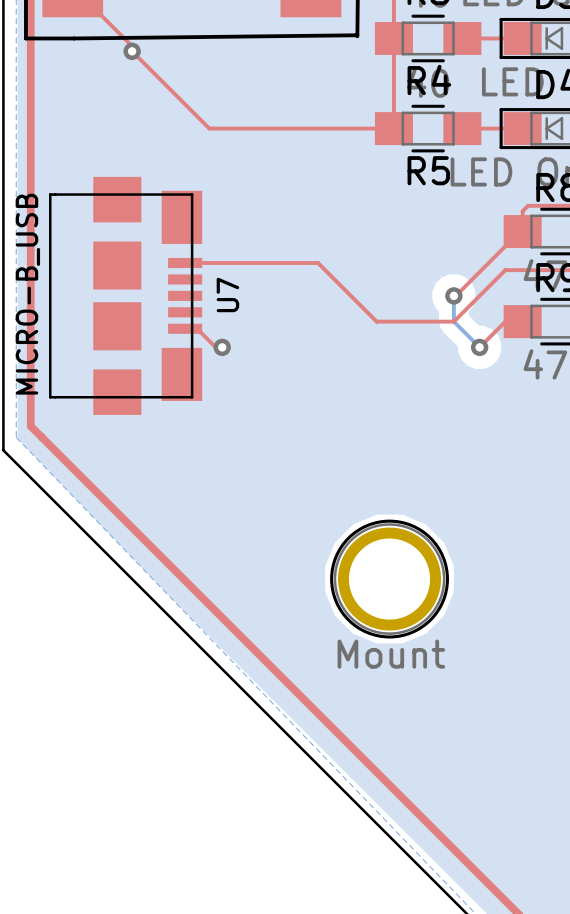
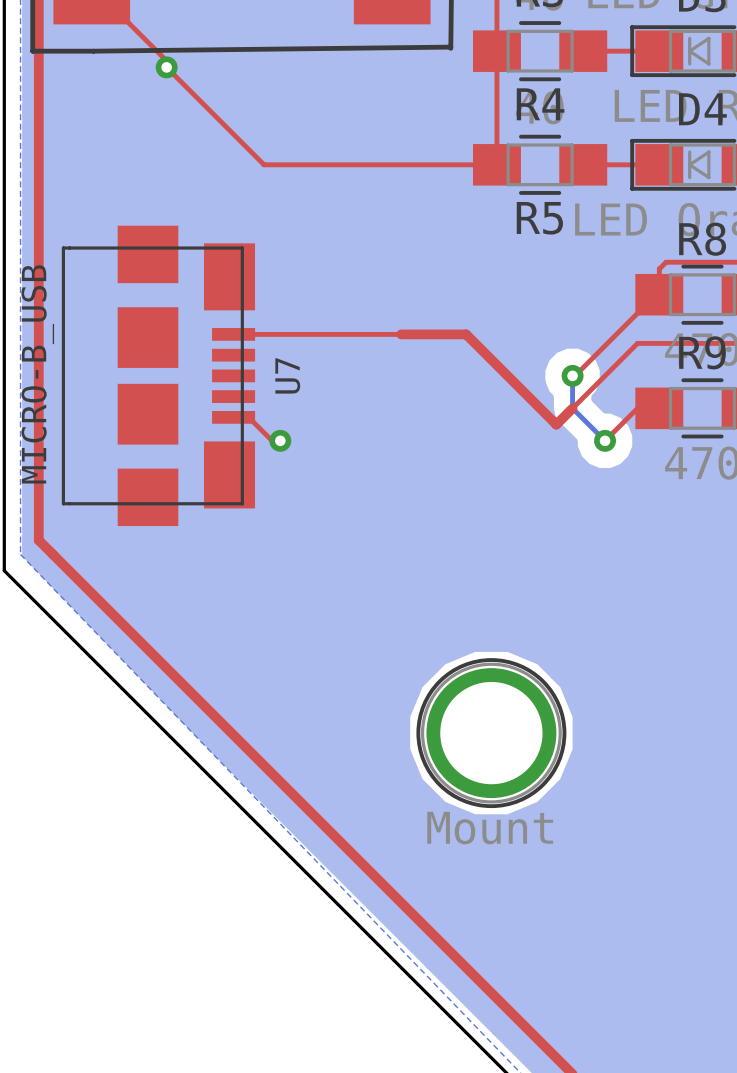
top track: (318, 263) (376, 321) (453, 321) -> (401, 334) (466, 334) (556, 424) (572, 408)

